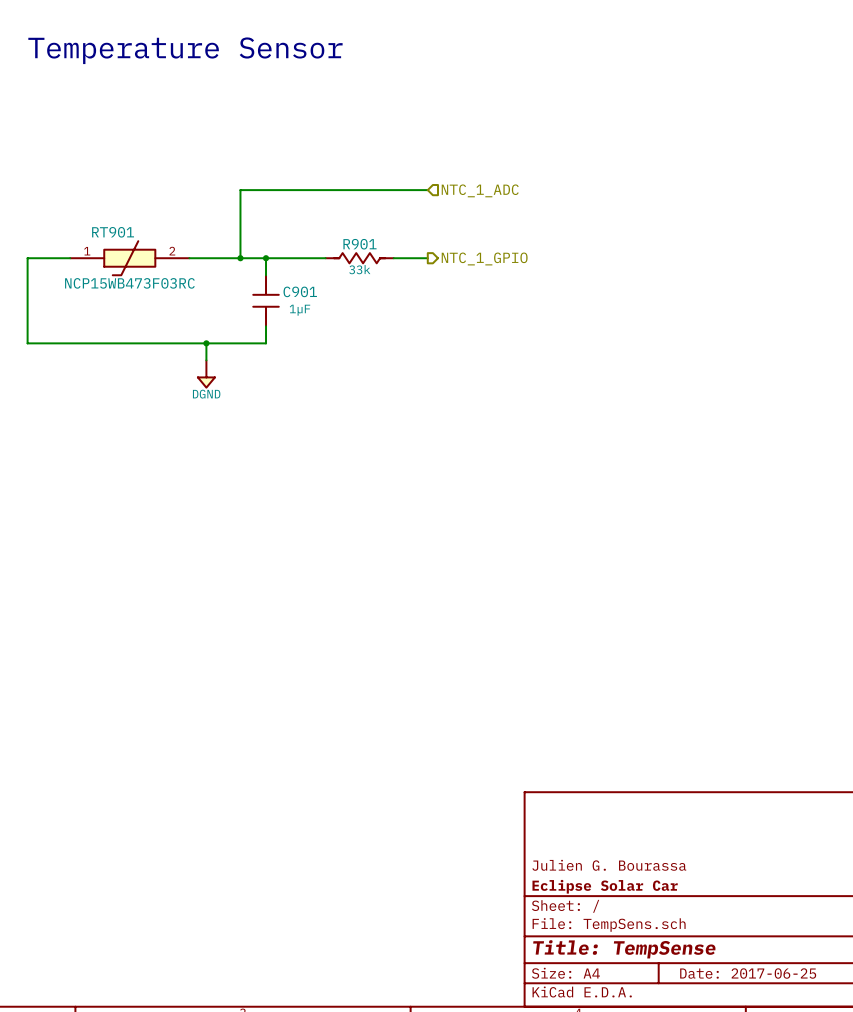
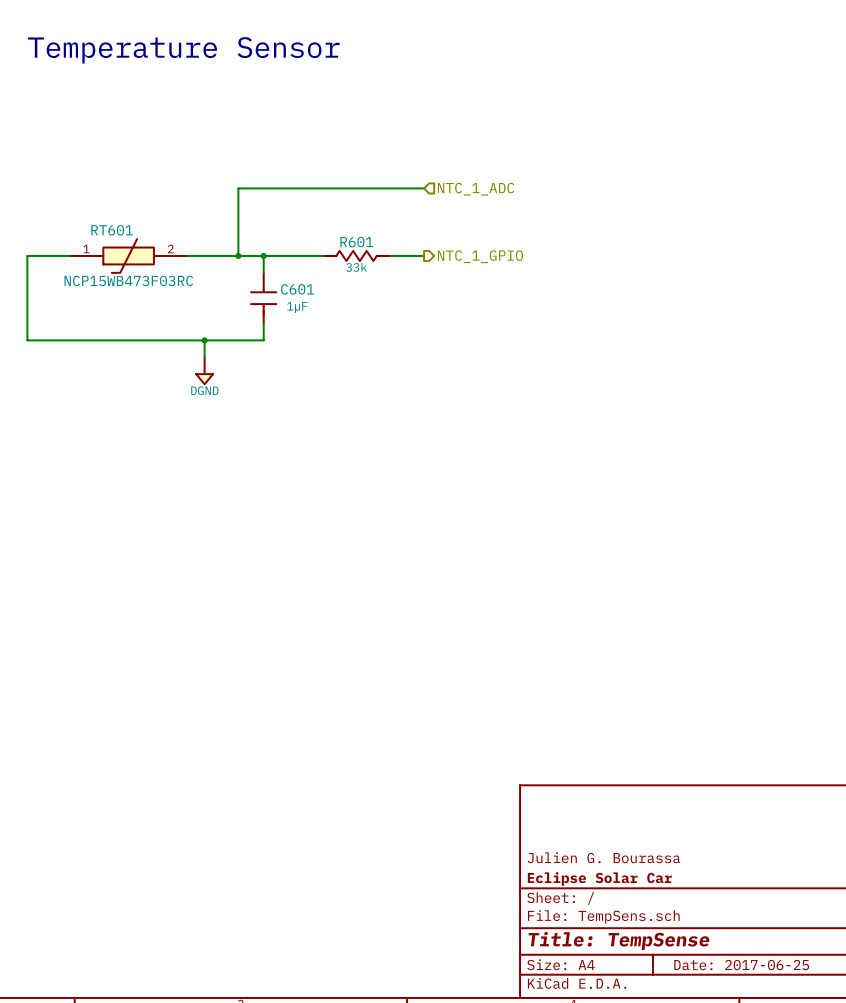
RT901 name: RT901 (113, 232) -> RT601 (112, 230)
R901 name: R901 (359, 244) -> R601 (356, 242)
C901 name: C901 (300, 291) -> C601 (297, 289)

